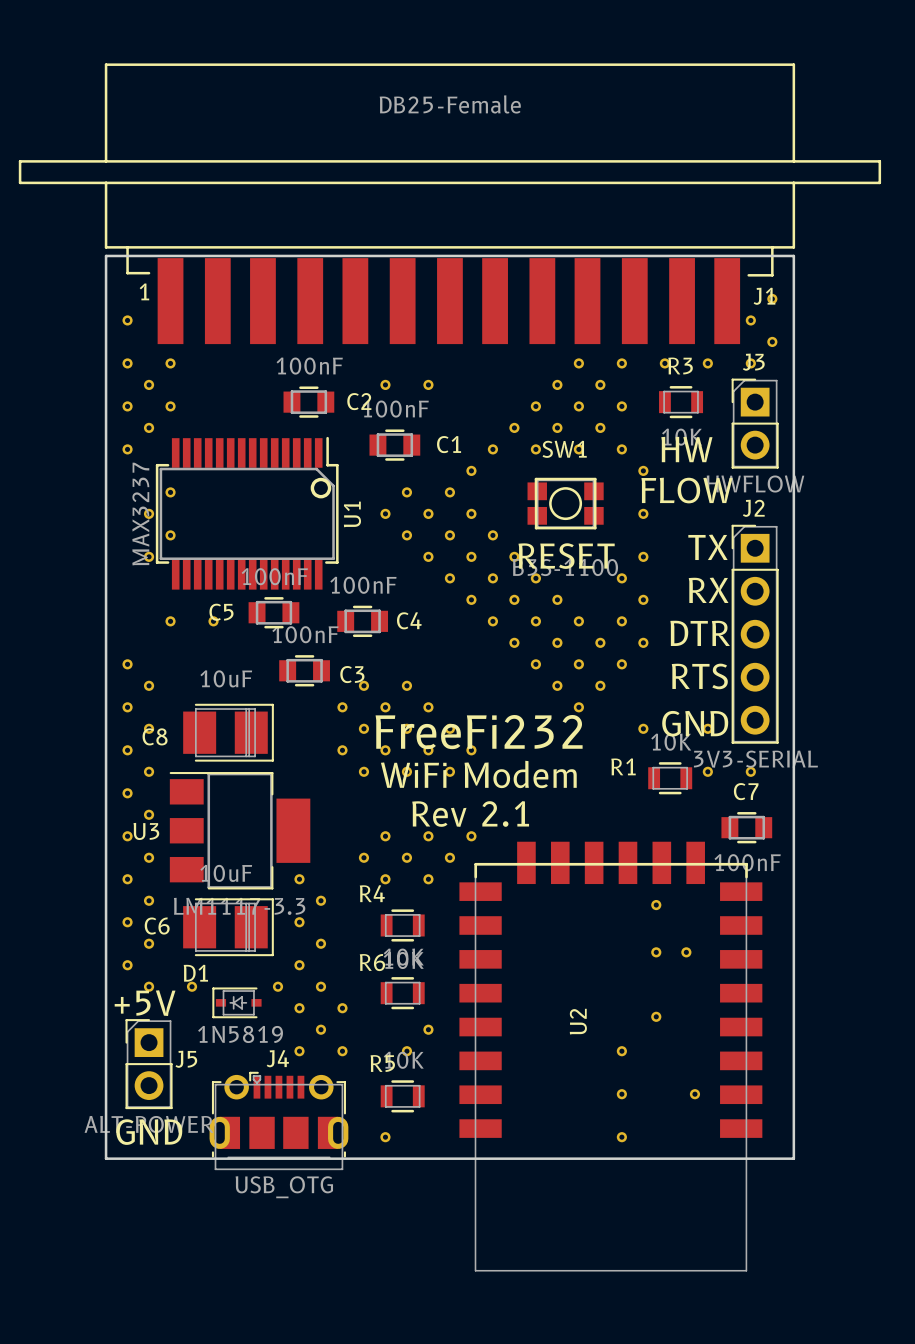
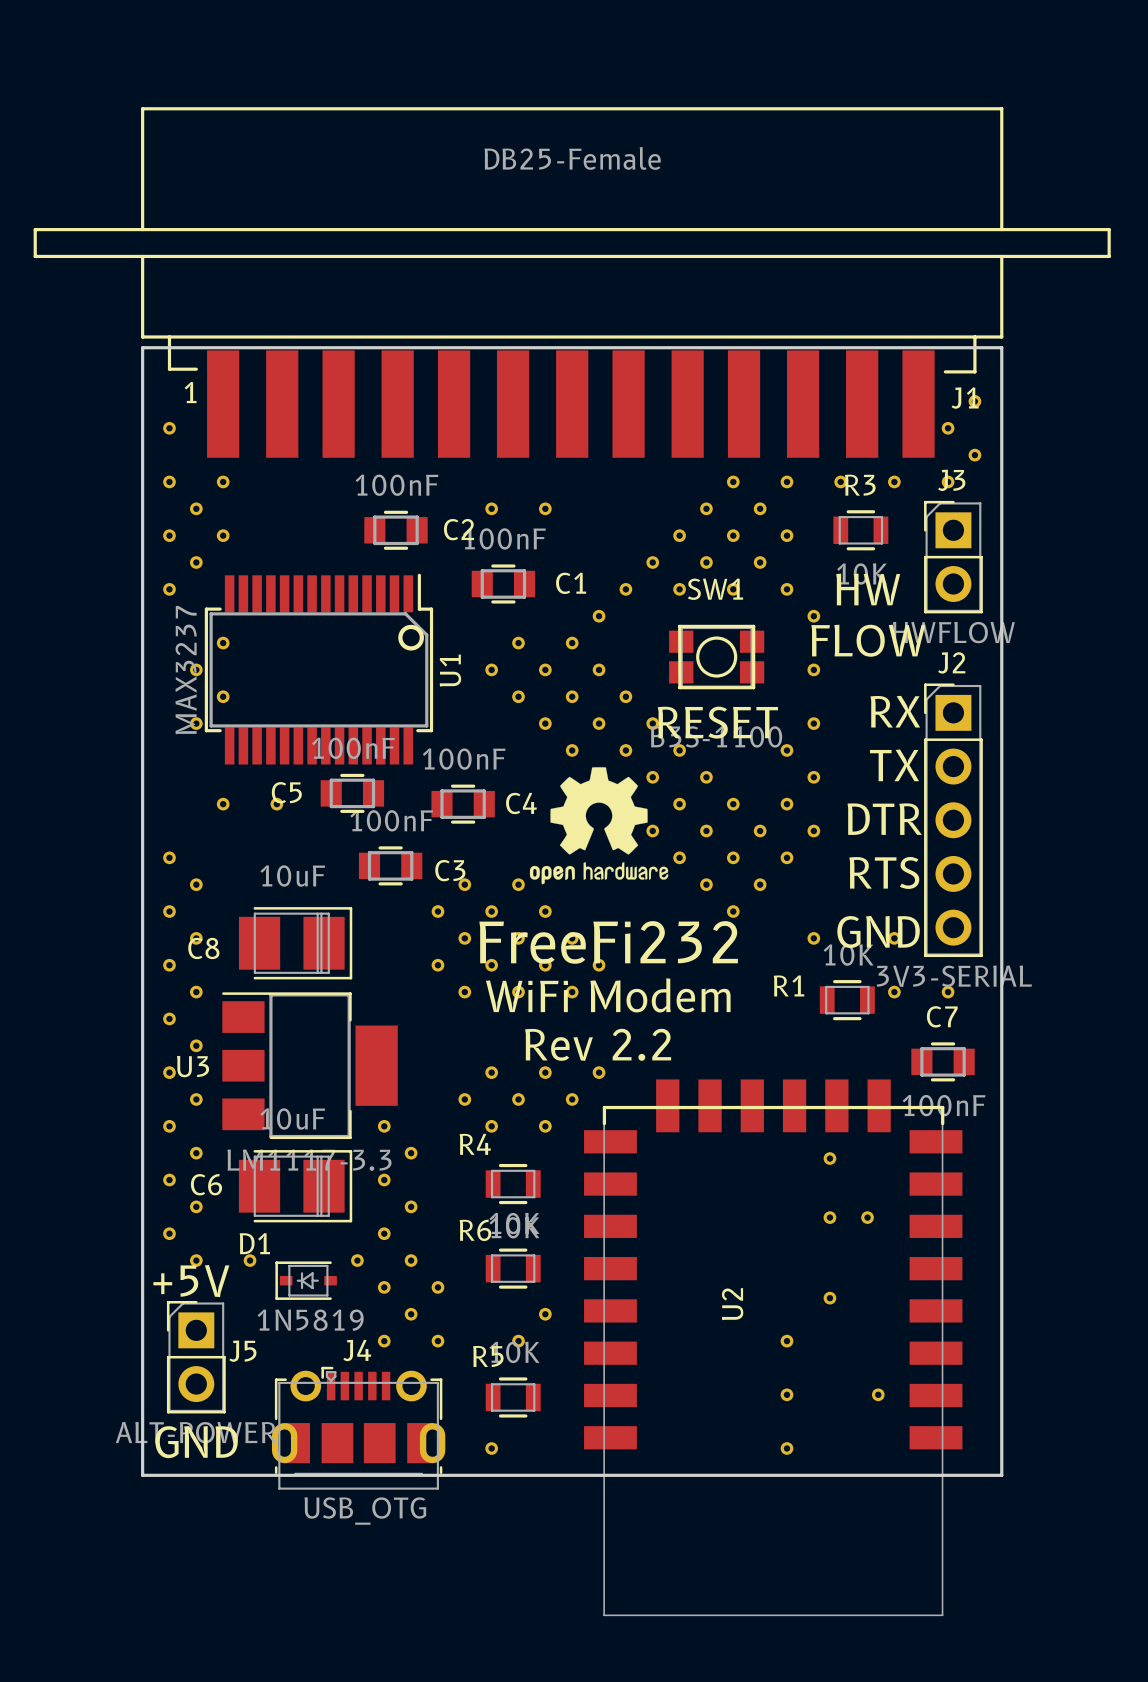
text: TX (707, 547) -> RX (895, 711)
text: RX (708, 590) -> TX (894, 765)
drawing: none -> [529, 767, 669, 885]
text: Rev 2.1 (470, 814) -> Rev 2.2 (598, 1044)

